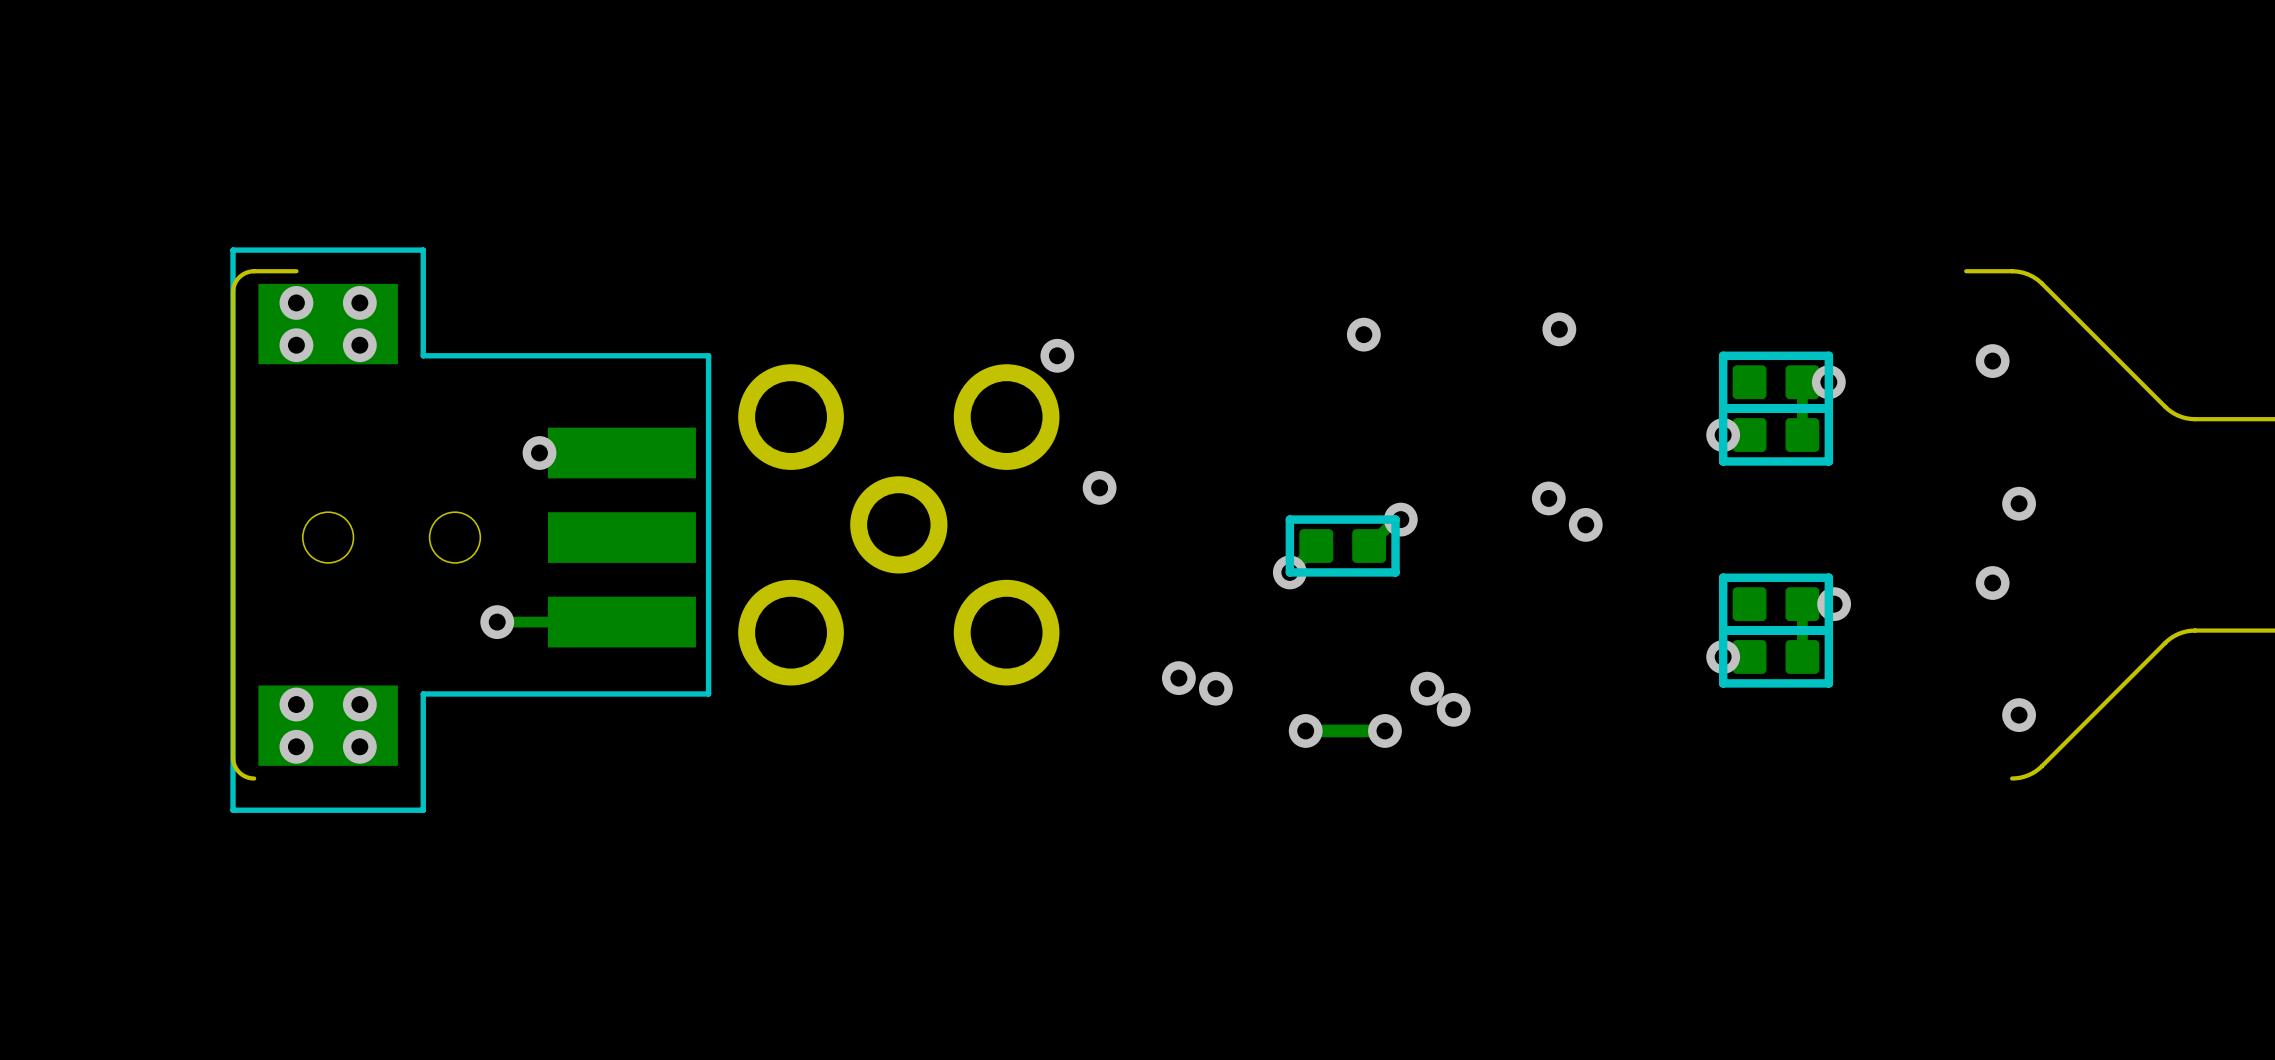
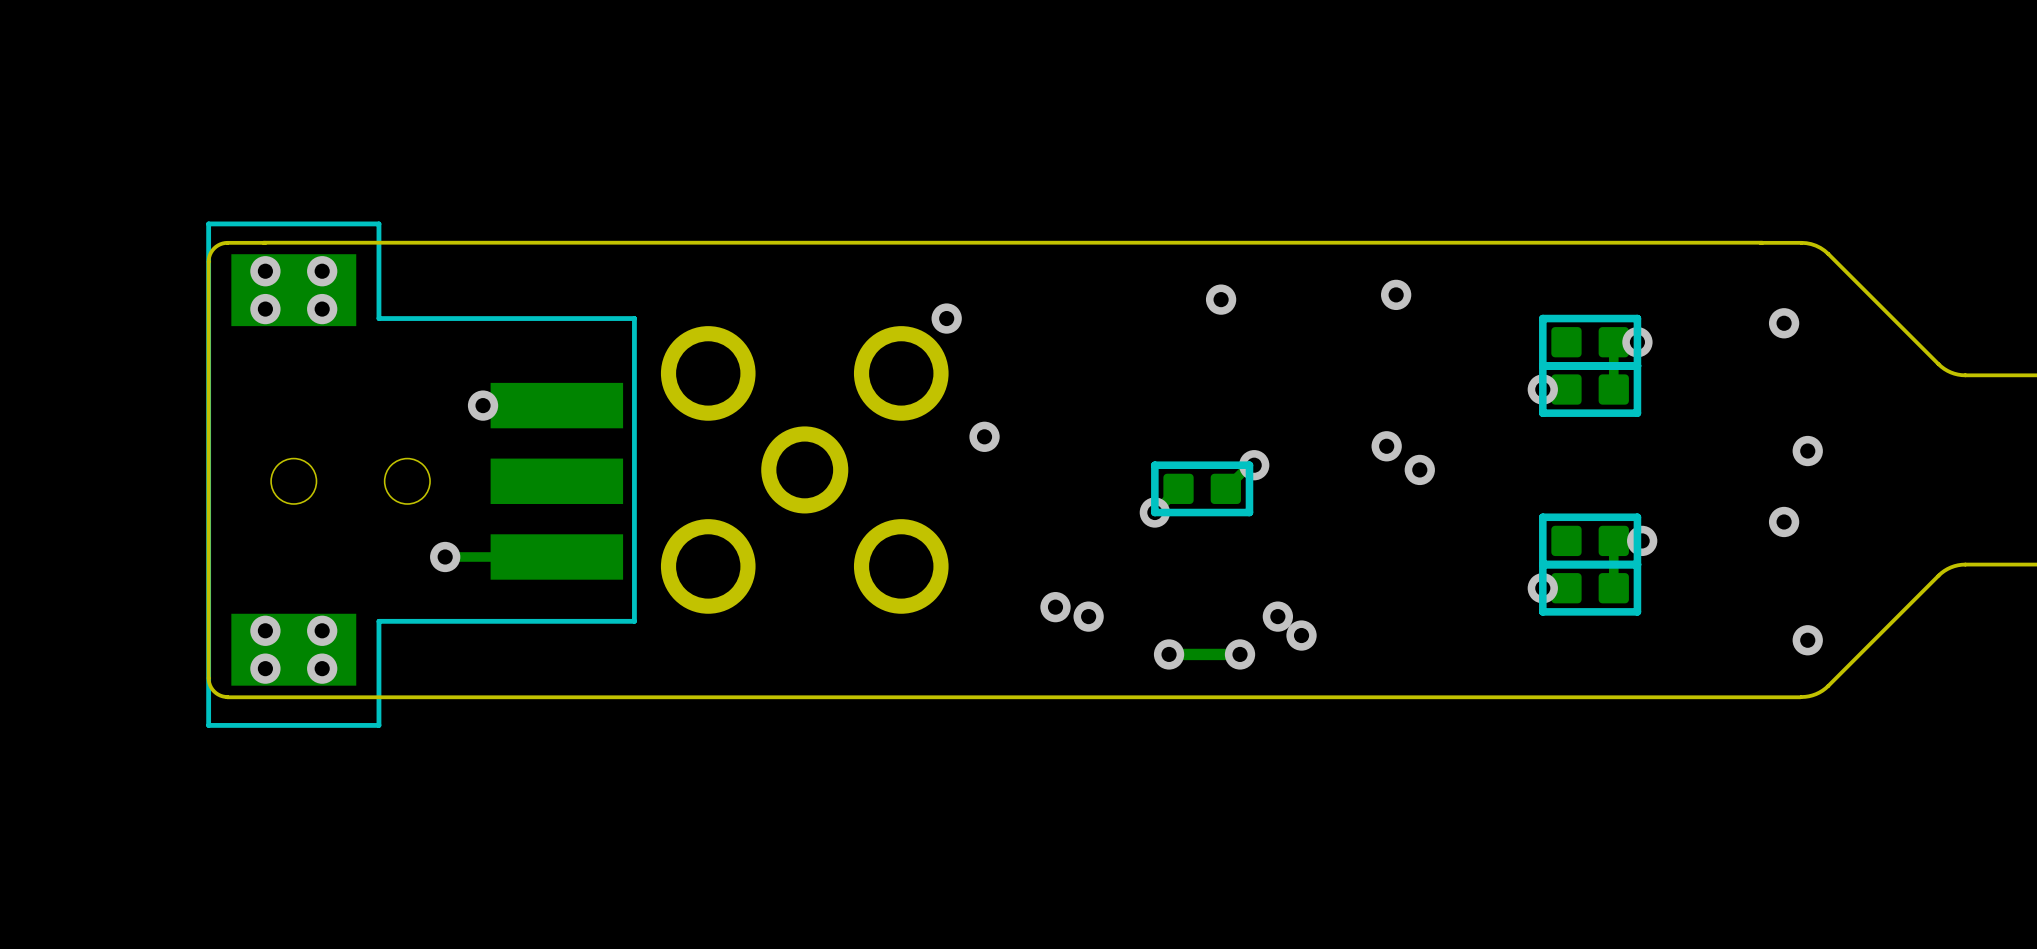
board edge: none -> (1760, 242) (265, 242)
board edge: none -> (1800, 697) (227, 697)

